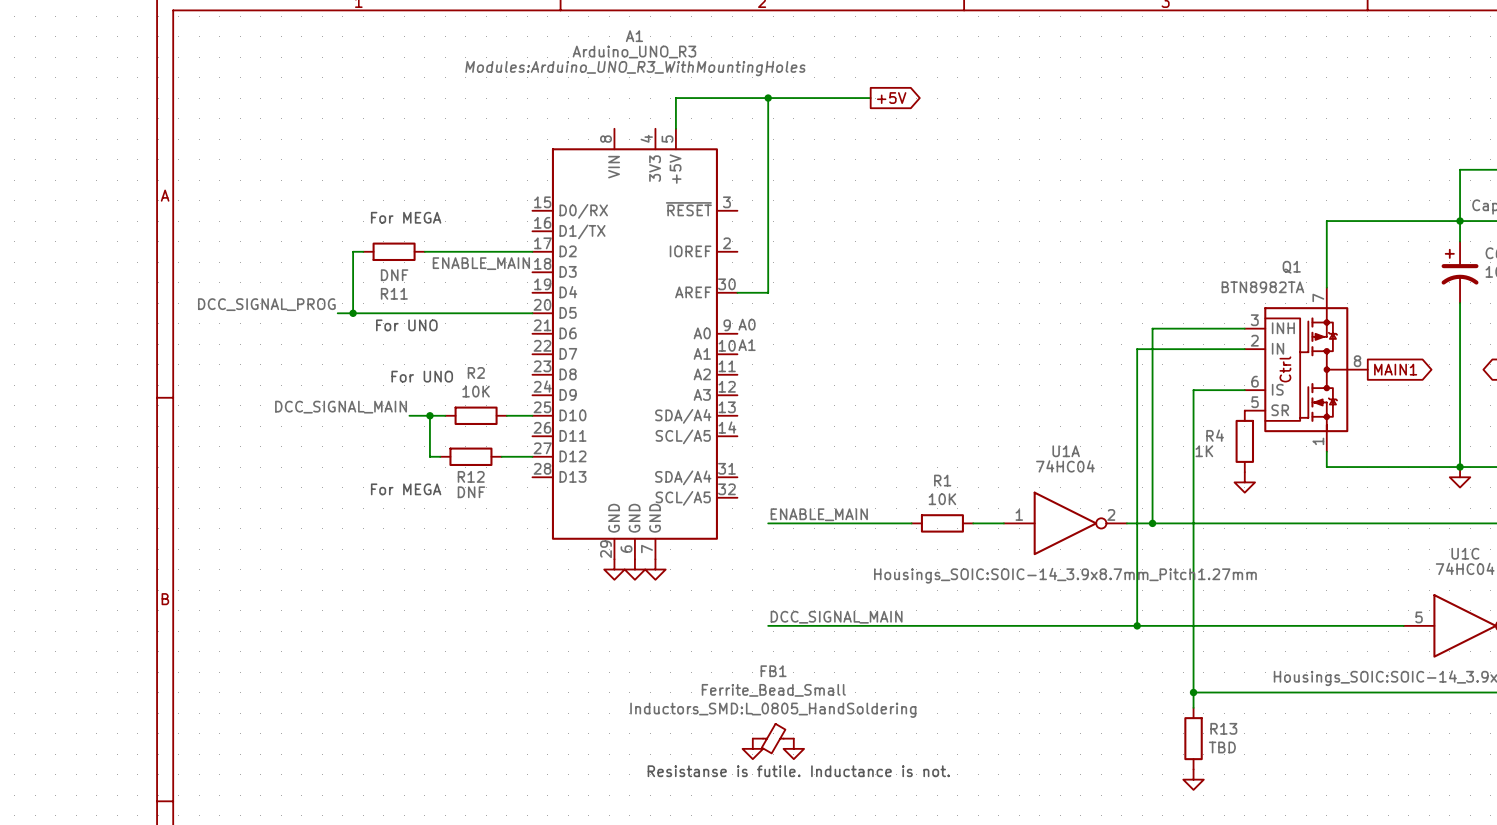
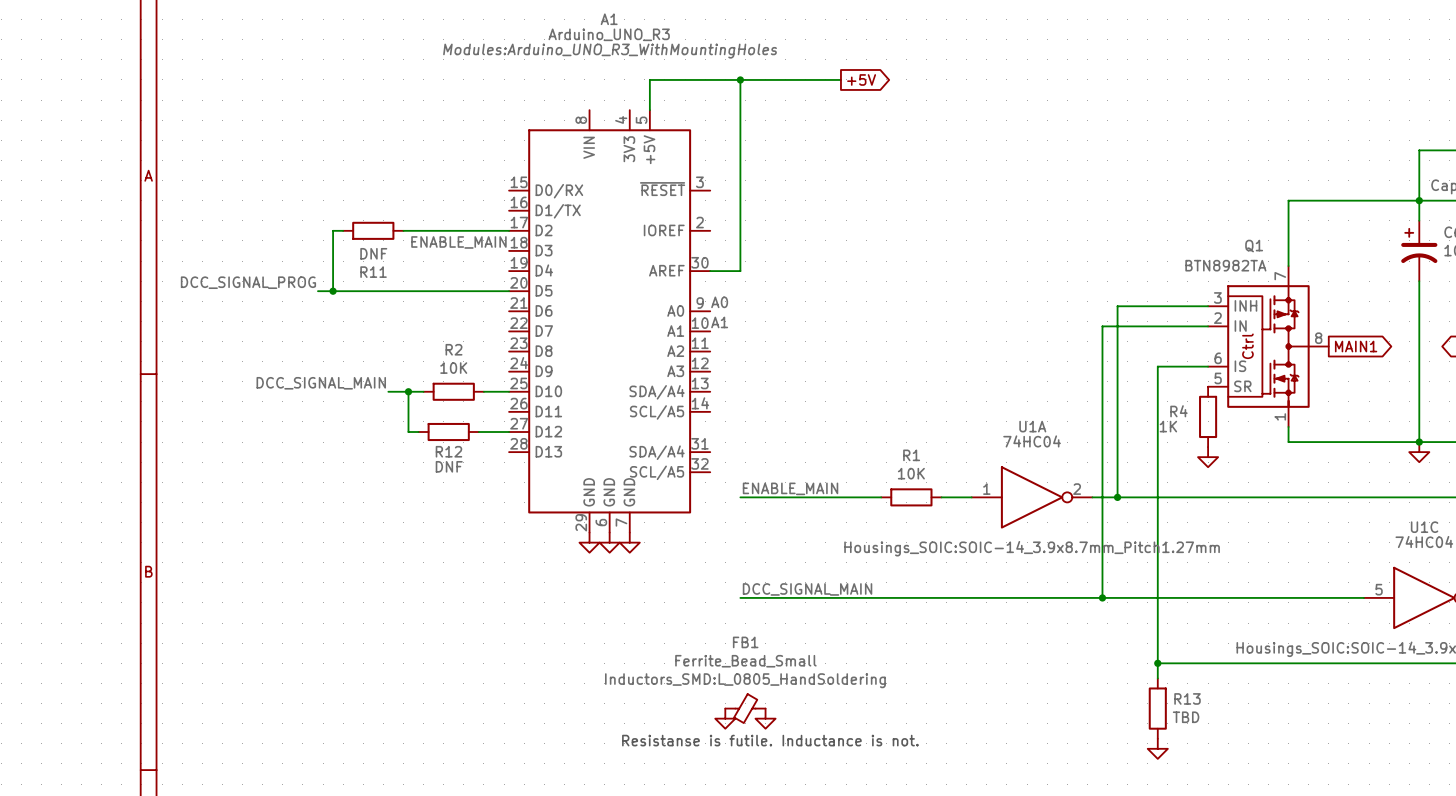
text: For MEGA (406, 217) -> none
text: For UNO (406, 325) -> none
text: For UNO (422, 376) -> none
text: For MEGA (406, 489) -> none

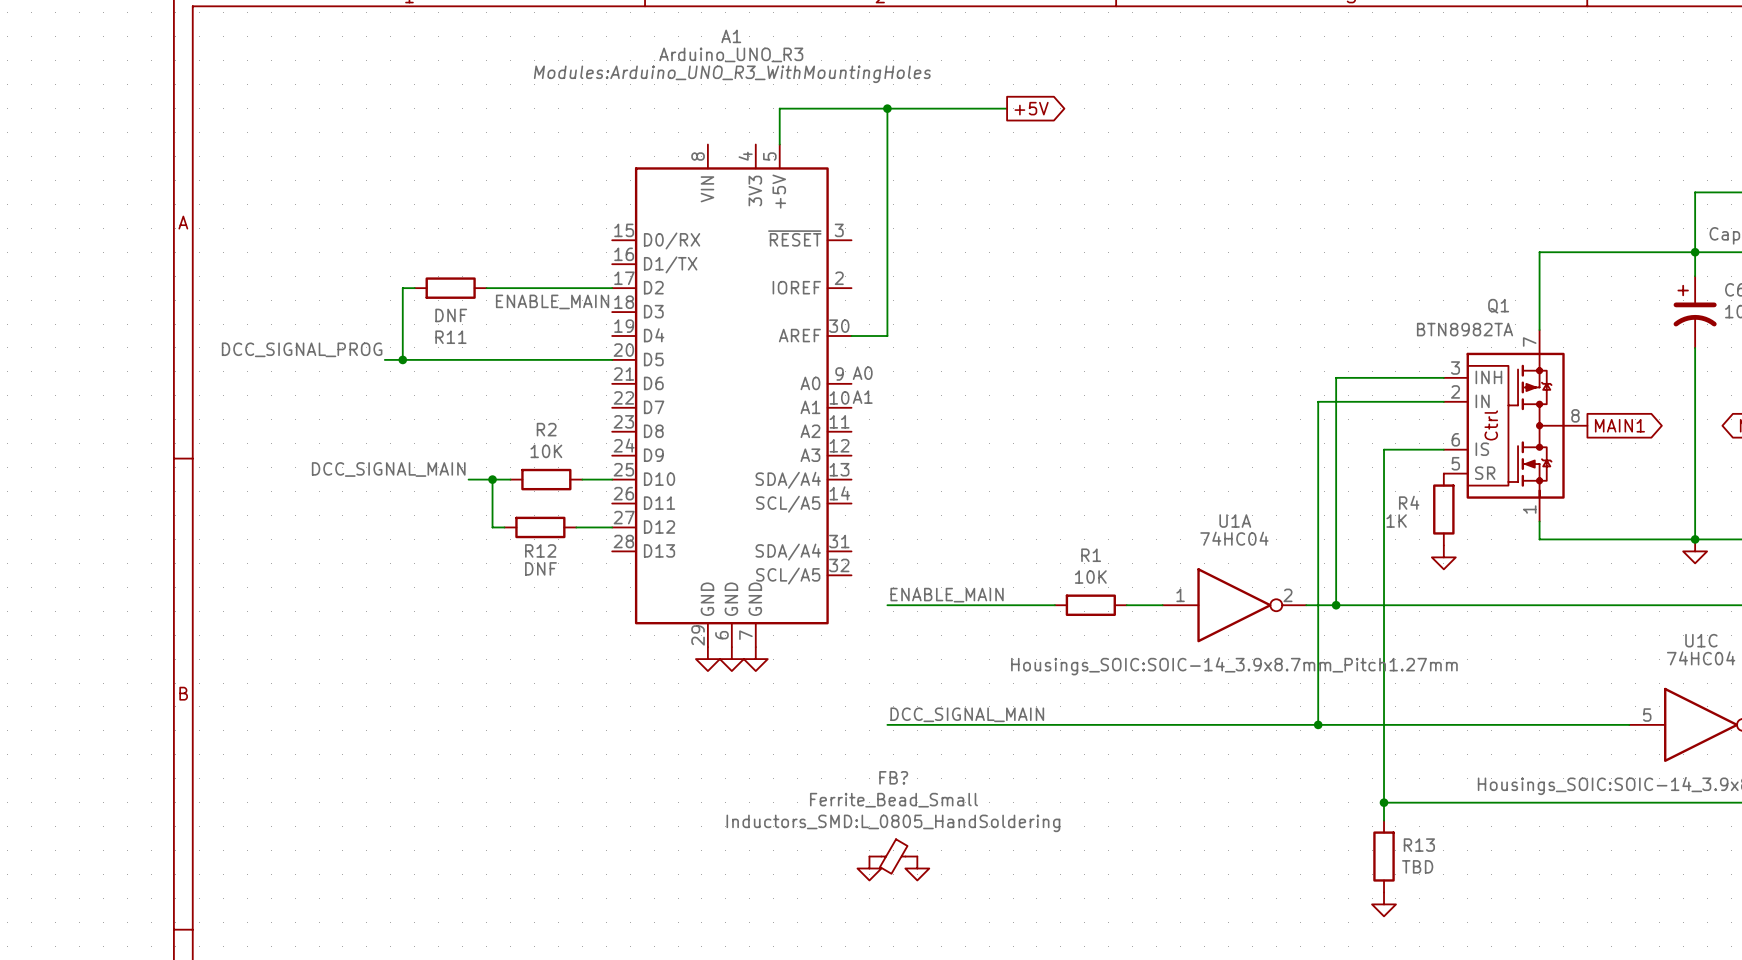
FB1 name: FB1 (745, 642) -> FB? (893, 777)
text: Resistanse is futile. Inductance is not. (770, 740) -> none

